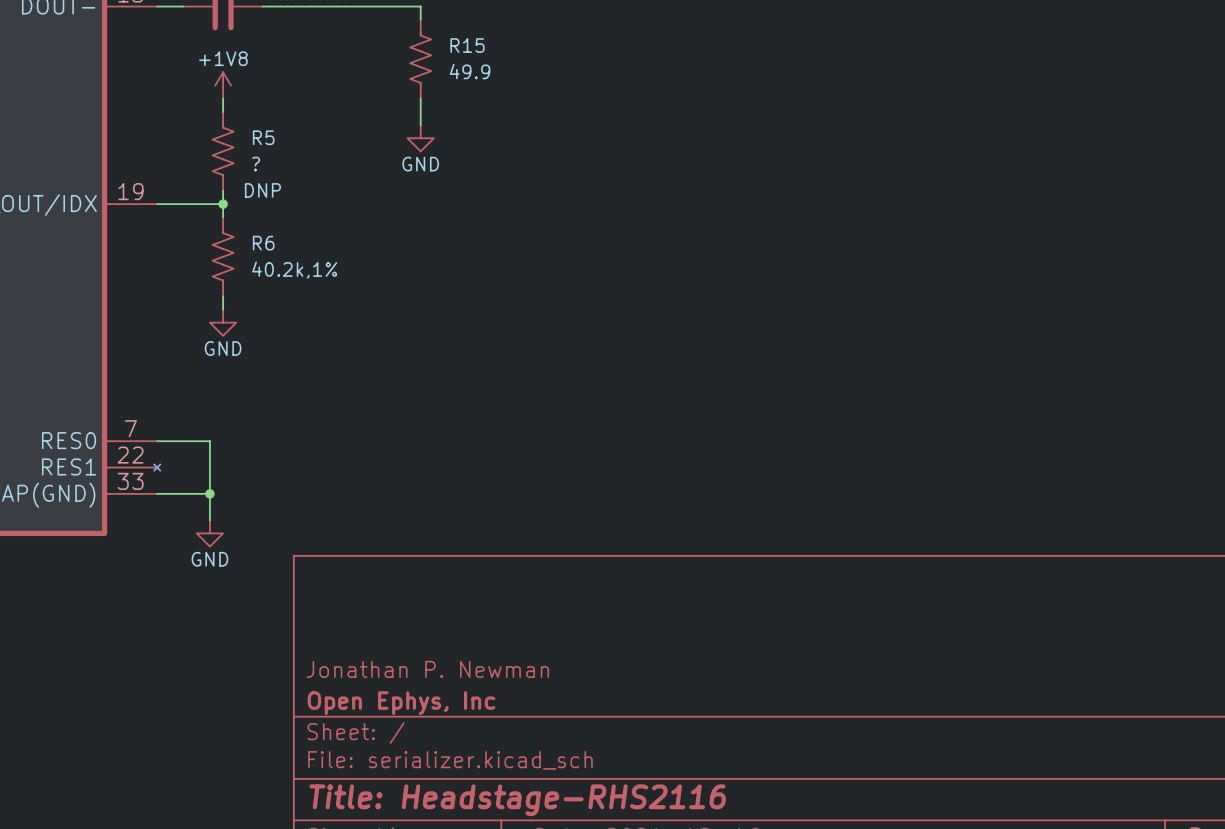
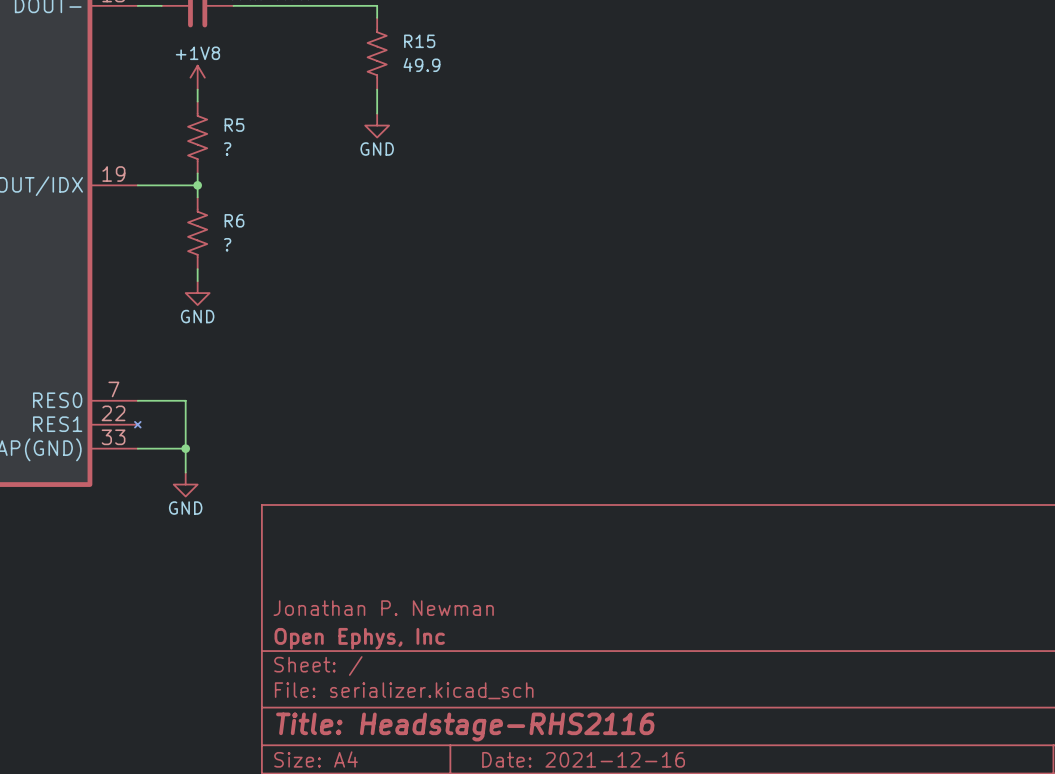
R5 text: DNP (262, 190) -> none
R6 value: 40.2k,1% (294, 270) -> ? (227, 244)

